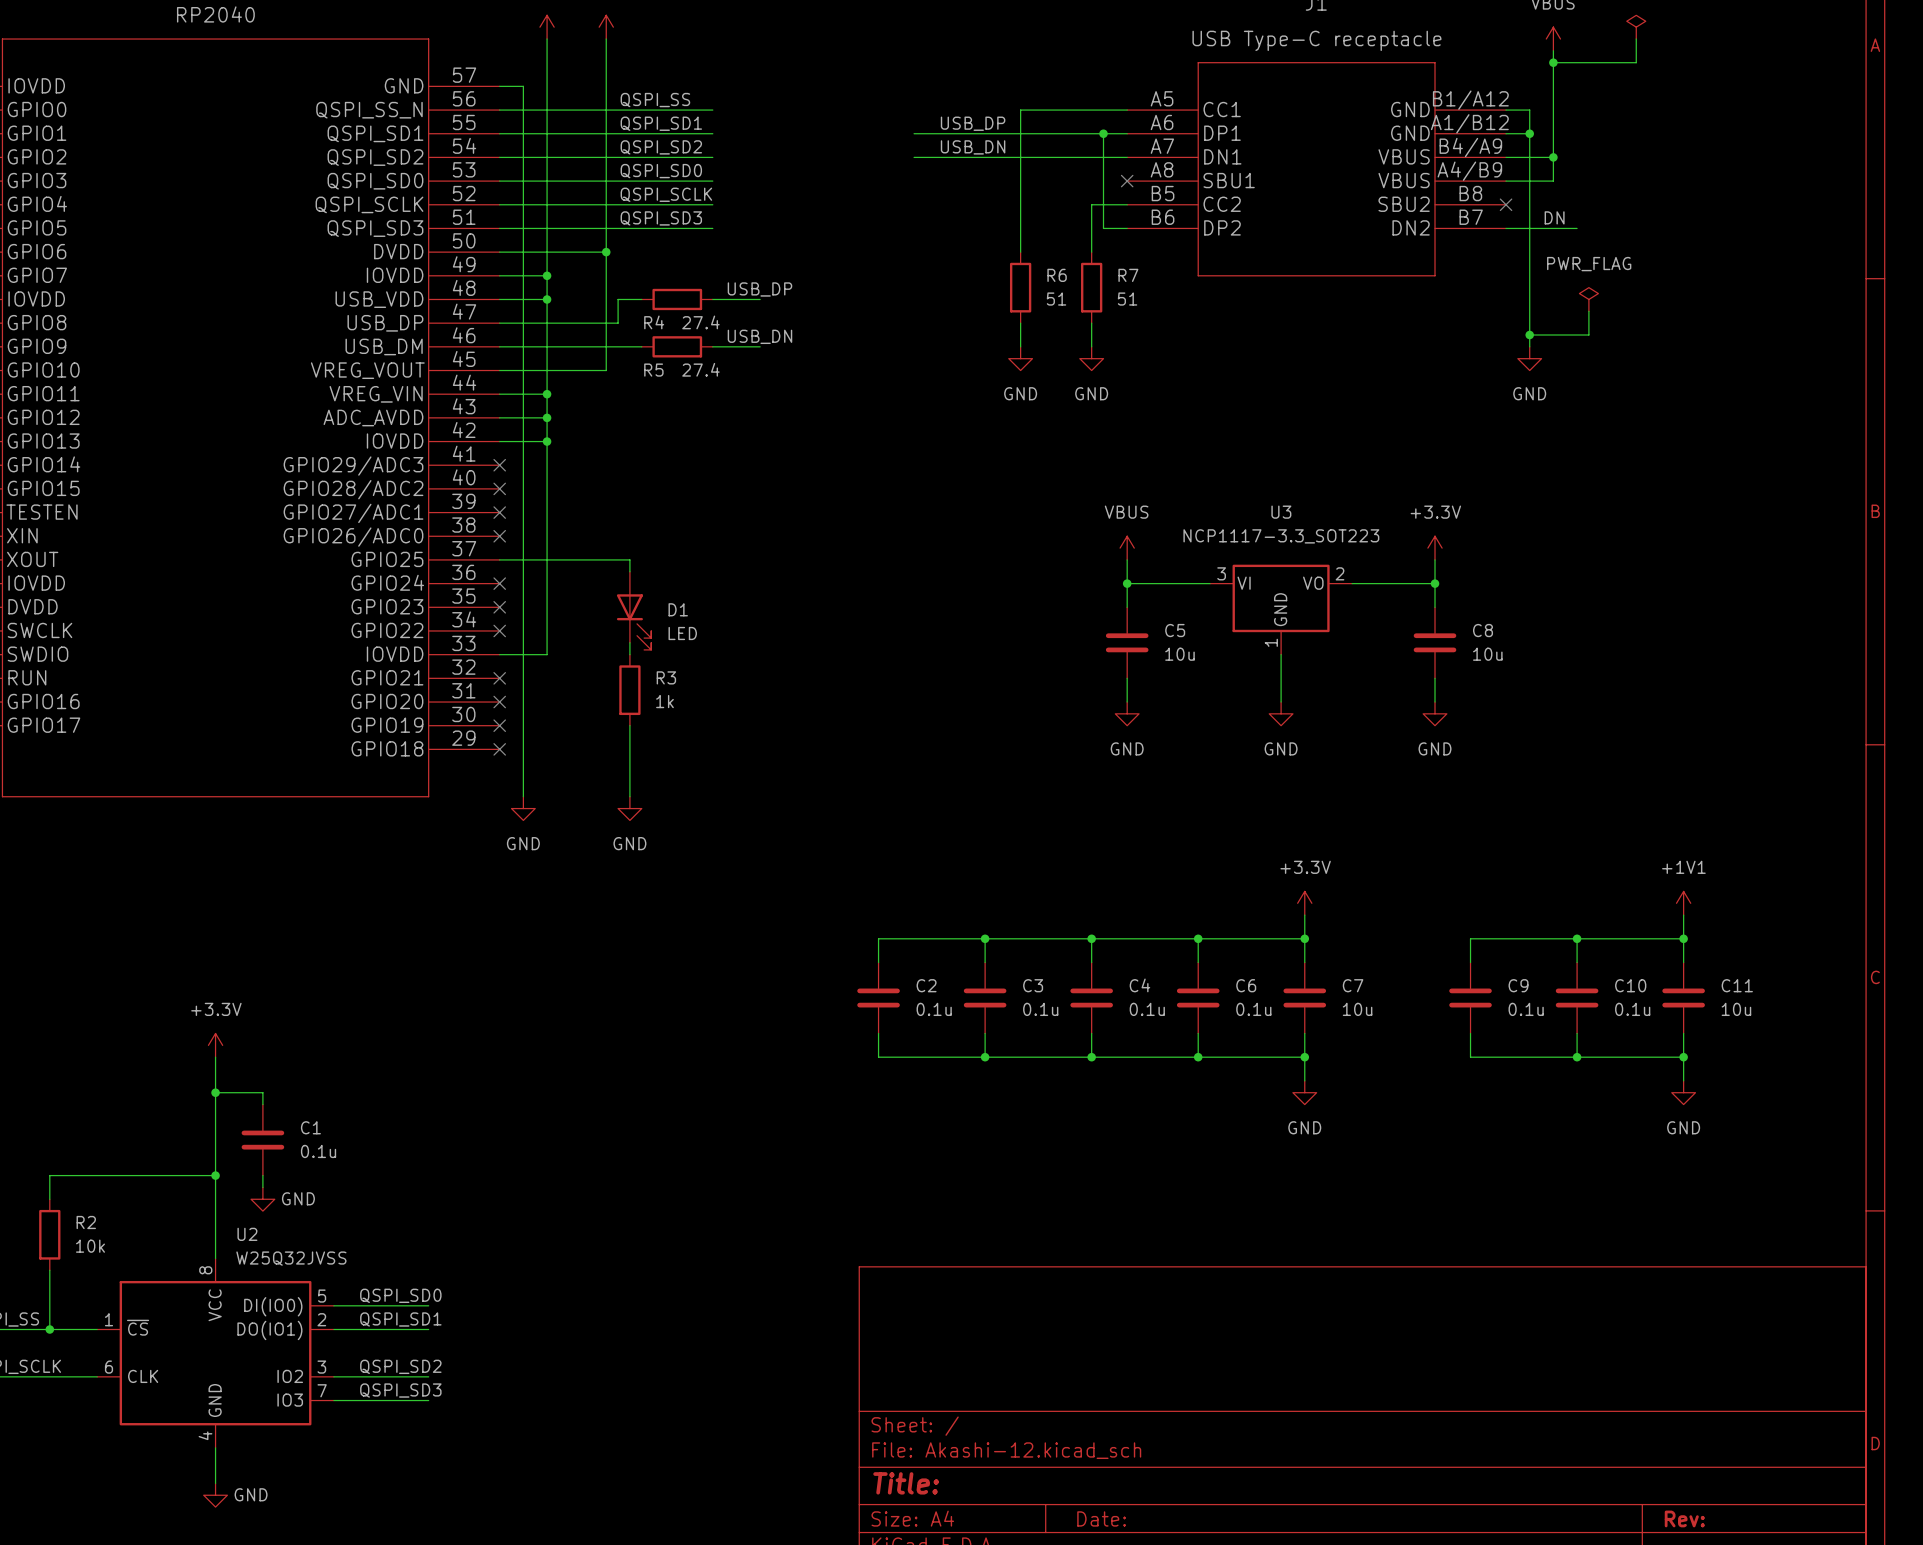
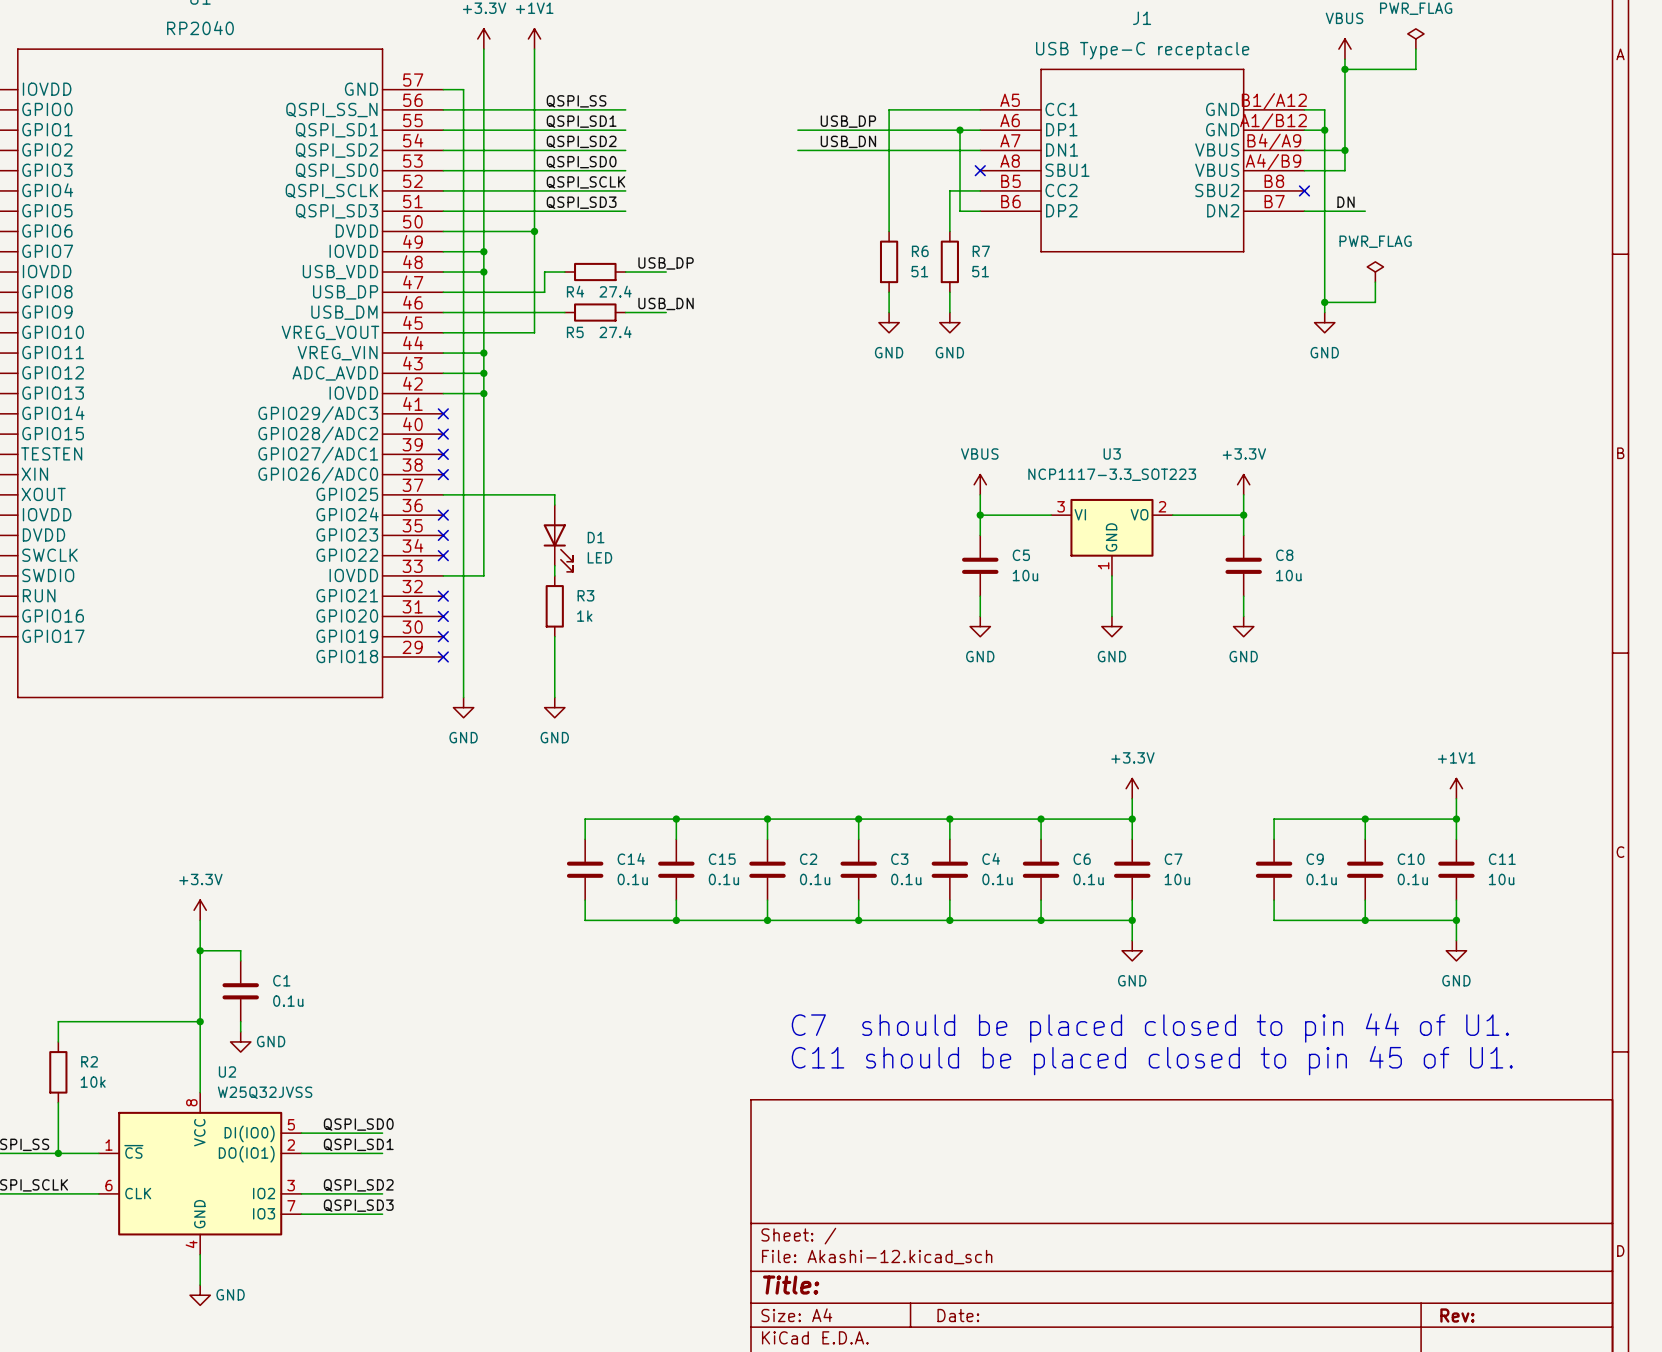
wire: none -> (676, 819) (676, 839)
junction: none -> (676, 819)
wire: none -> (767, 819) (585, 819) (585, 839)
junction: none -> (767, 819)
C14: none -> 0.1u (585, 869)
C15: none -> 0.1u (676, 869)
wire: none -> (585, 900) (585, 920) (767, 920)
wire: none -> (676, 900) (676, 920)
junction: none -> (676, 920)
junction: none -> (767, 920)
text: none -> C7 should be placed closed to pin 44 of U1. (1150, 1028)
text: none -> C11 should be placed closed to pin 45 of U1. (1152, 1060)

